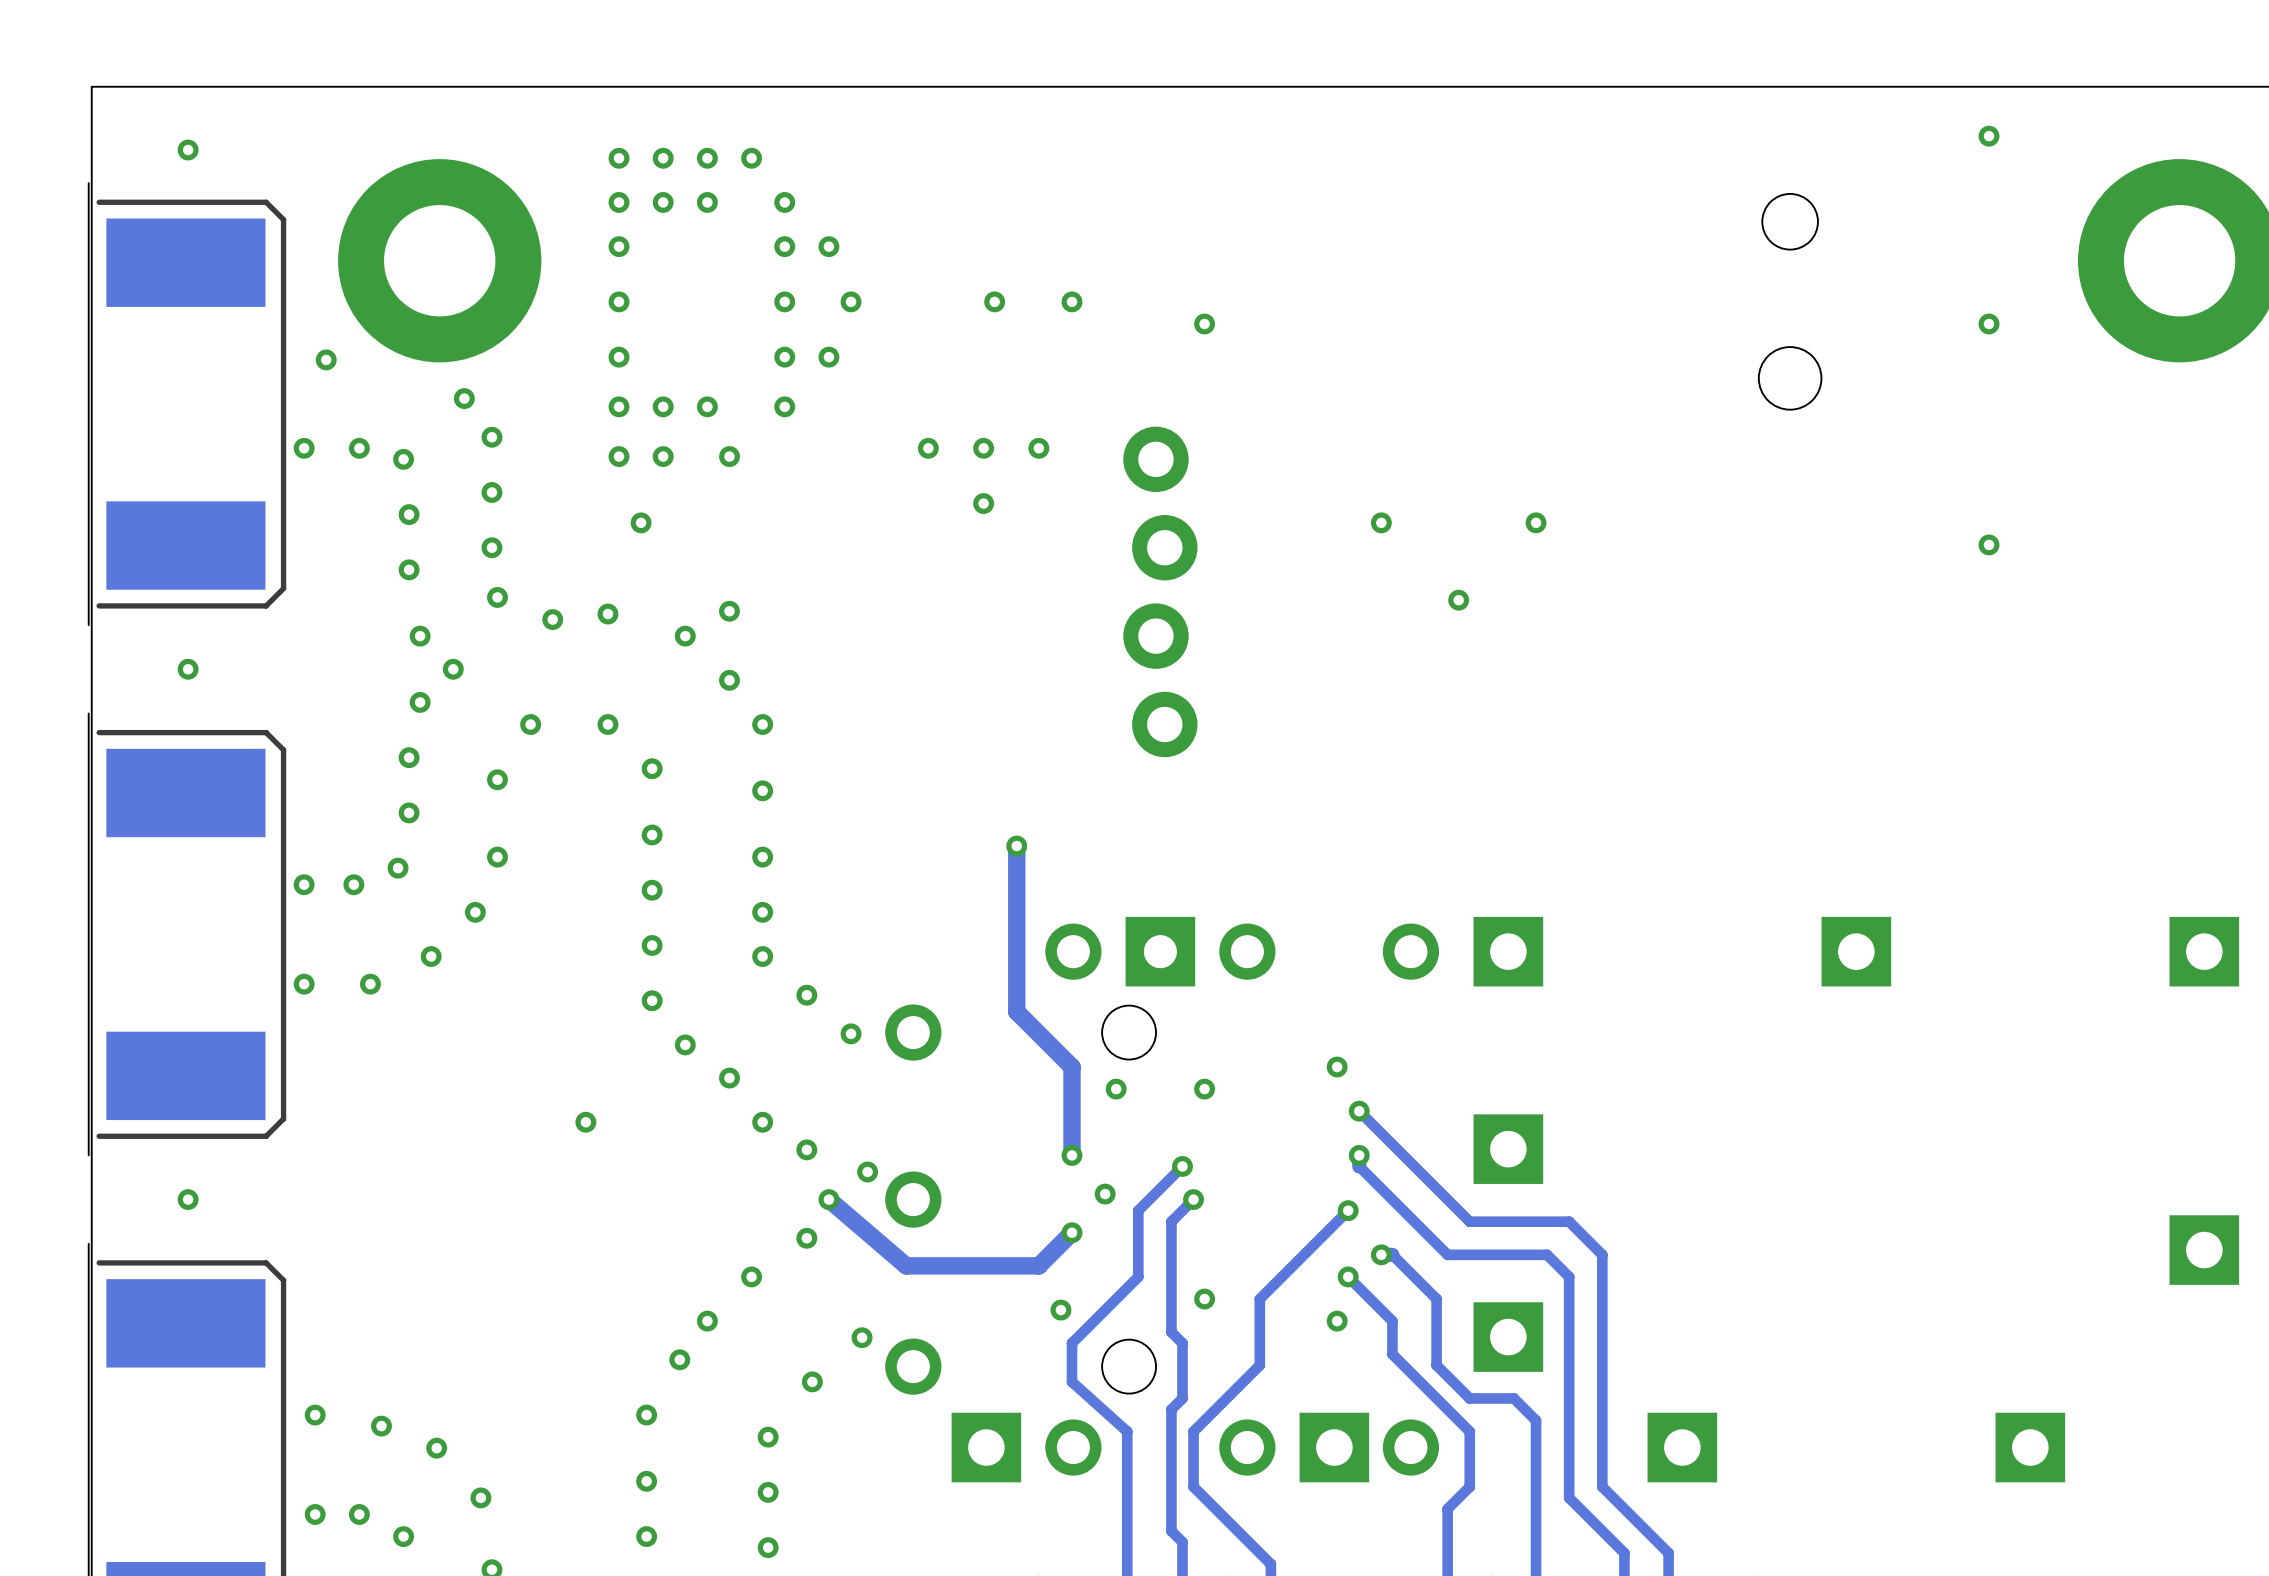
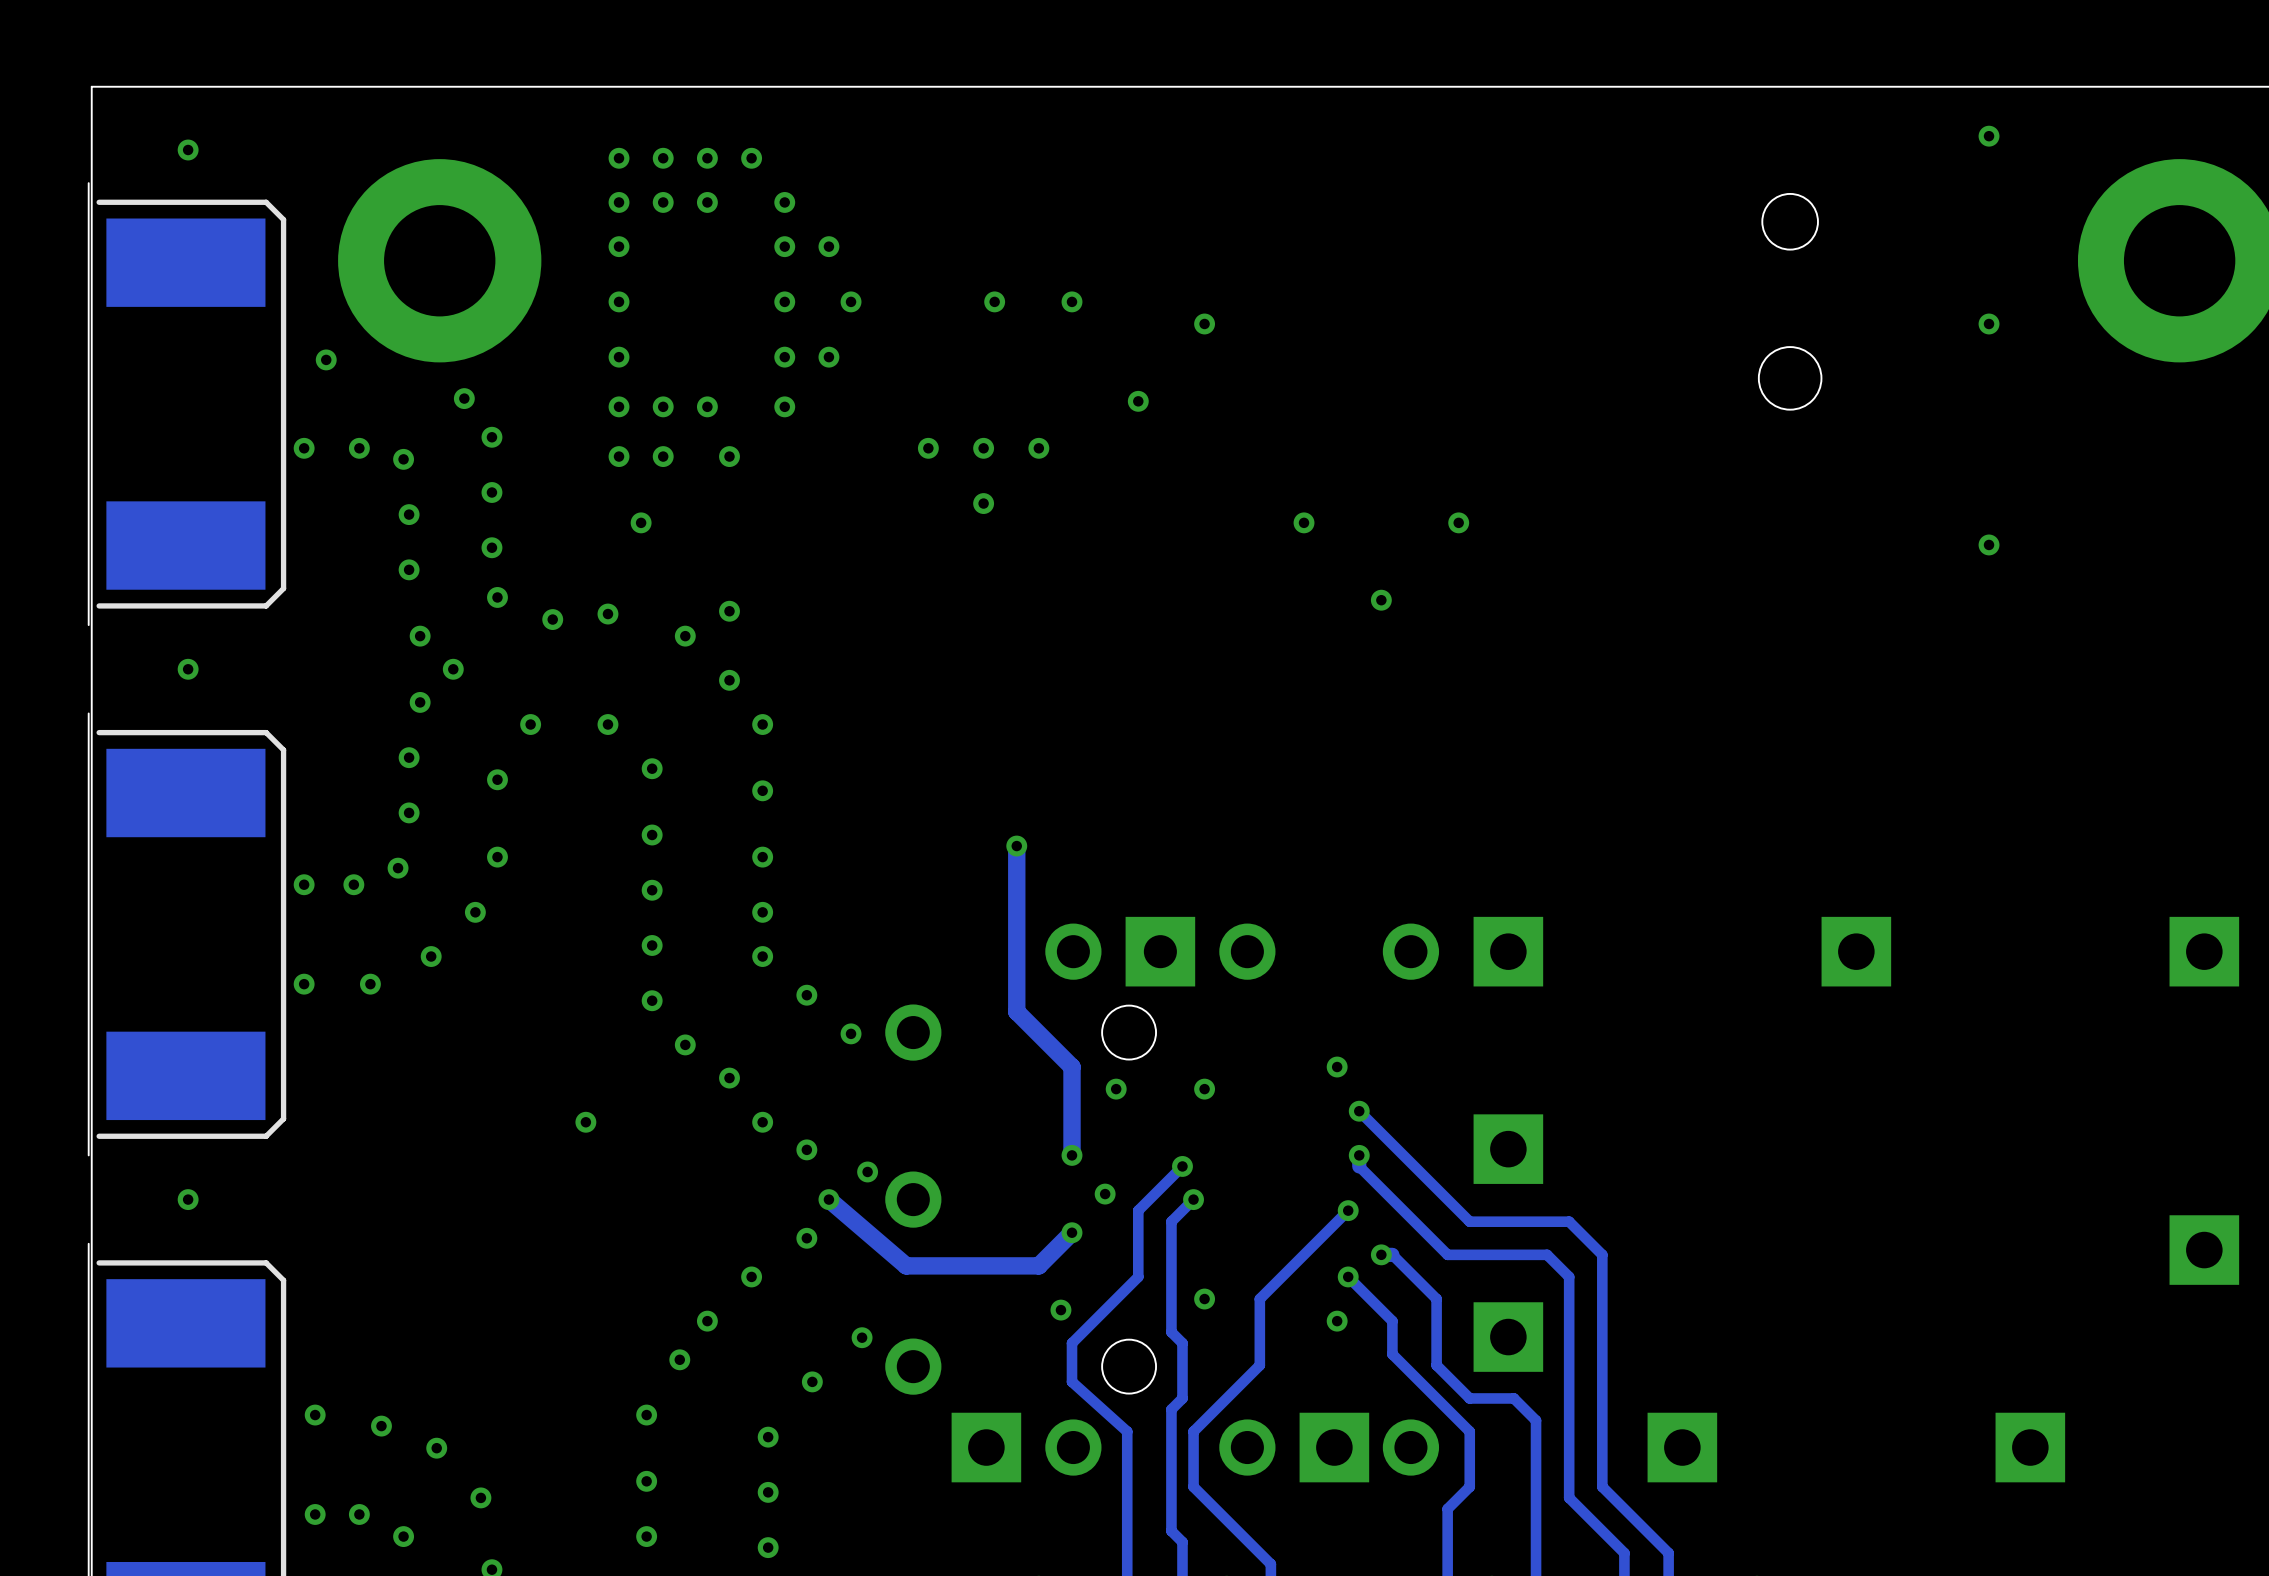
via: none -> (1138, 401)
via: none -> (1304, 522)
via: (1381, 522) -> none
via: none -> (1458, 522)
via: (1536, 522) -> none
part: (1160, 591) -> none
via: none -> (1381, 600)
via: (1458, 600) -> none

